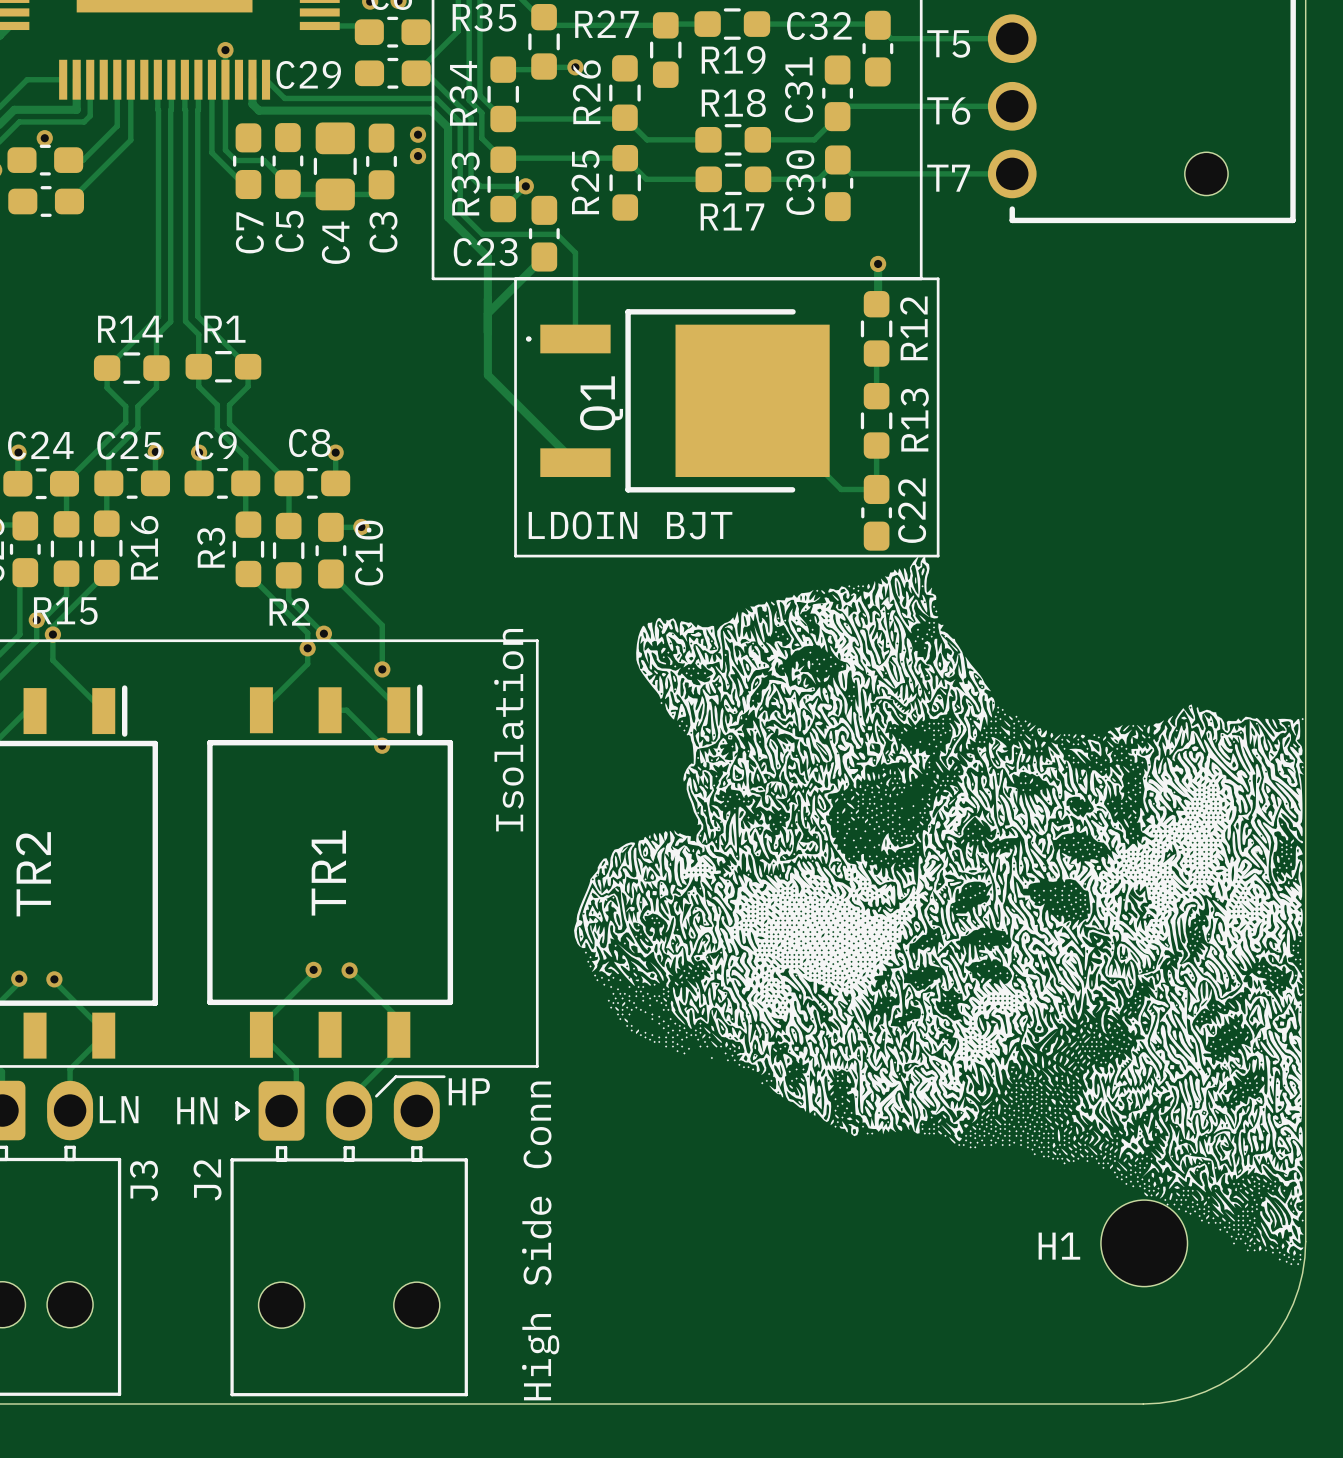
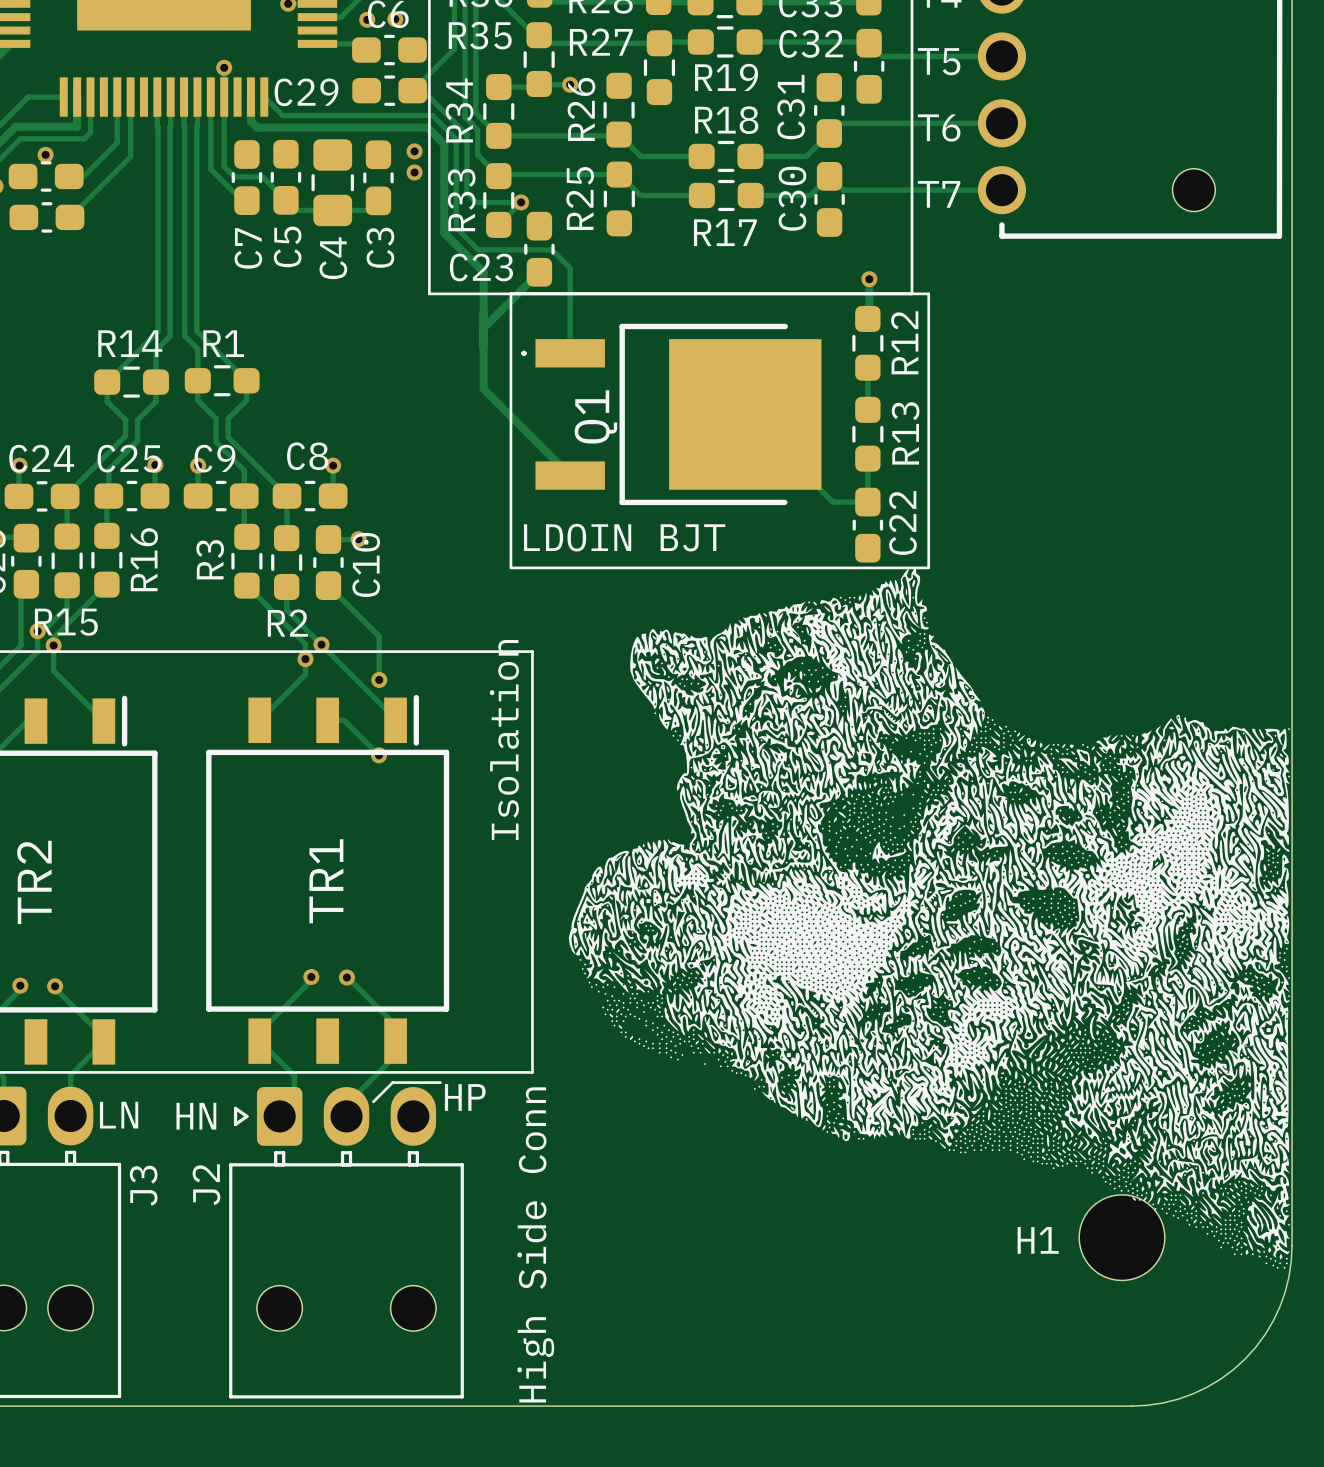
H1 position: (1144, 1243) -> (1122, 1237)

